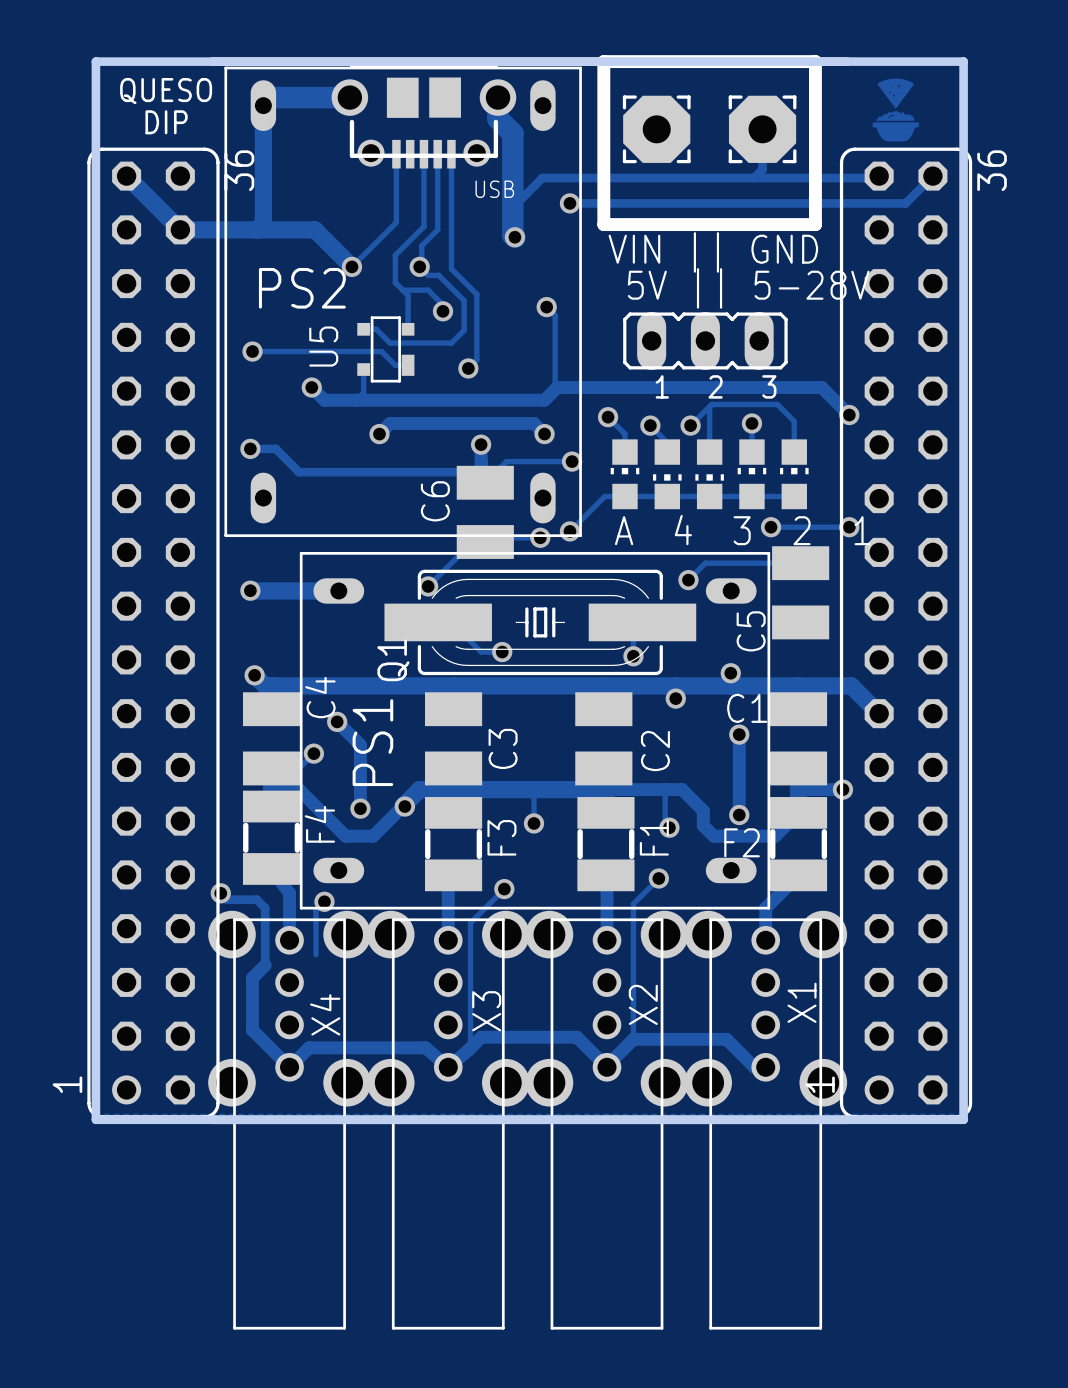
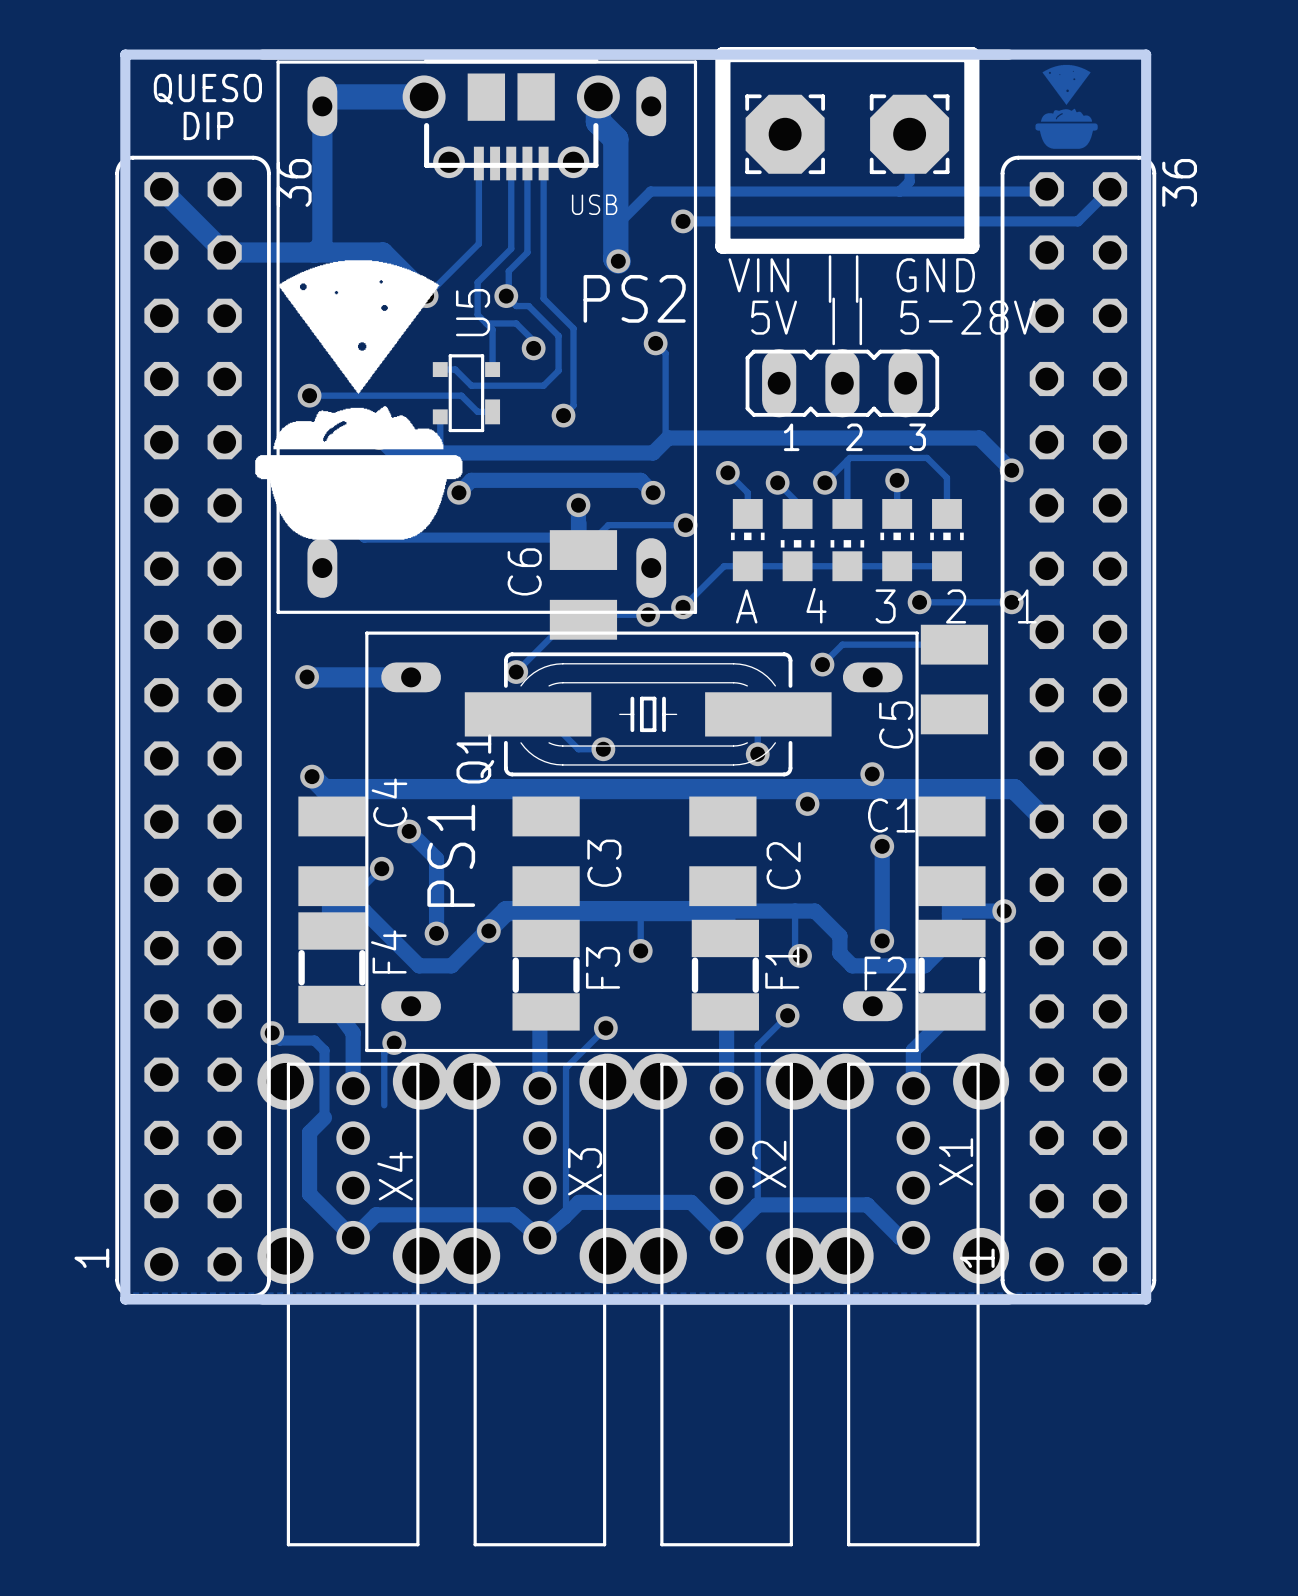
drawing shape: [872, 78, 920, 142] -> [1035, 64, 1098, 149]
drawing: none -> [255, 260, 463, 540]
text position: PS2 (302, 288) -> PS2 (634, 298)
U5 name position: U5 (323, 346) -> U5 (473, 312)

